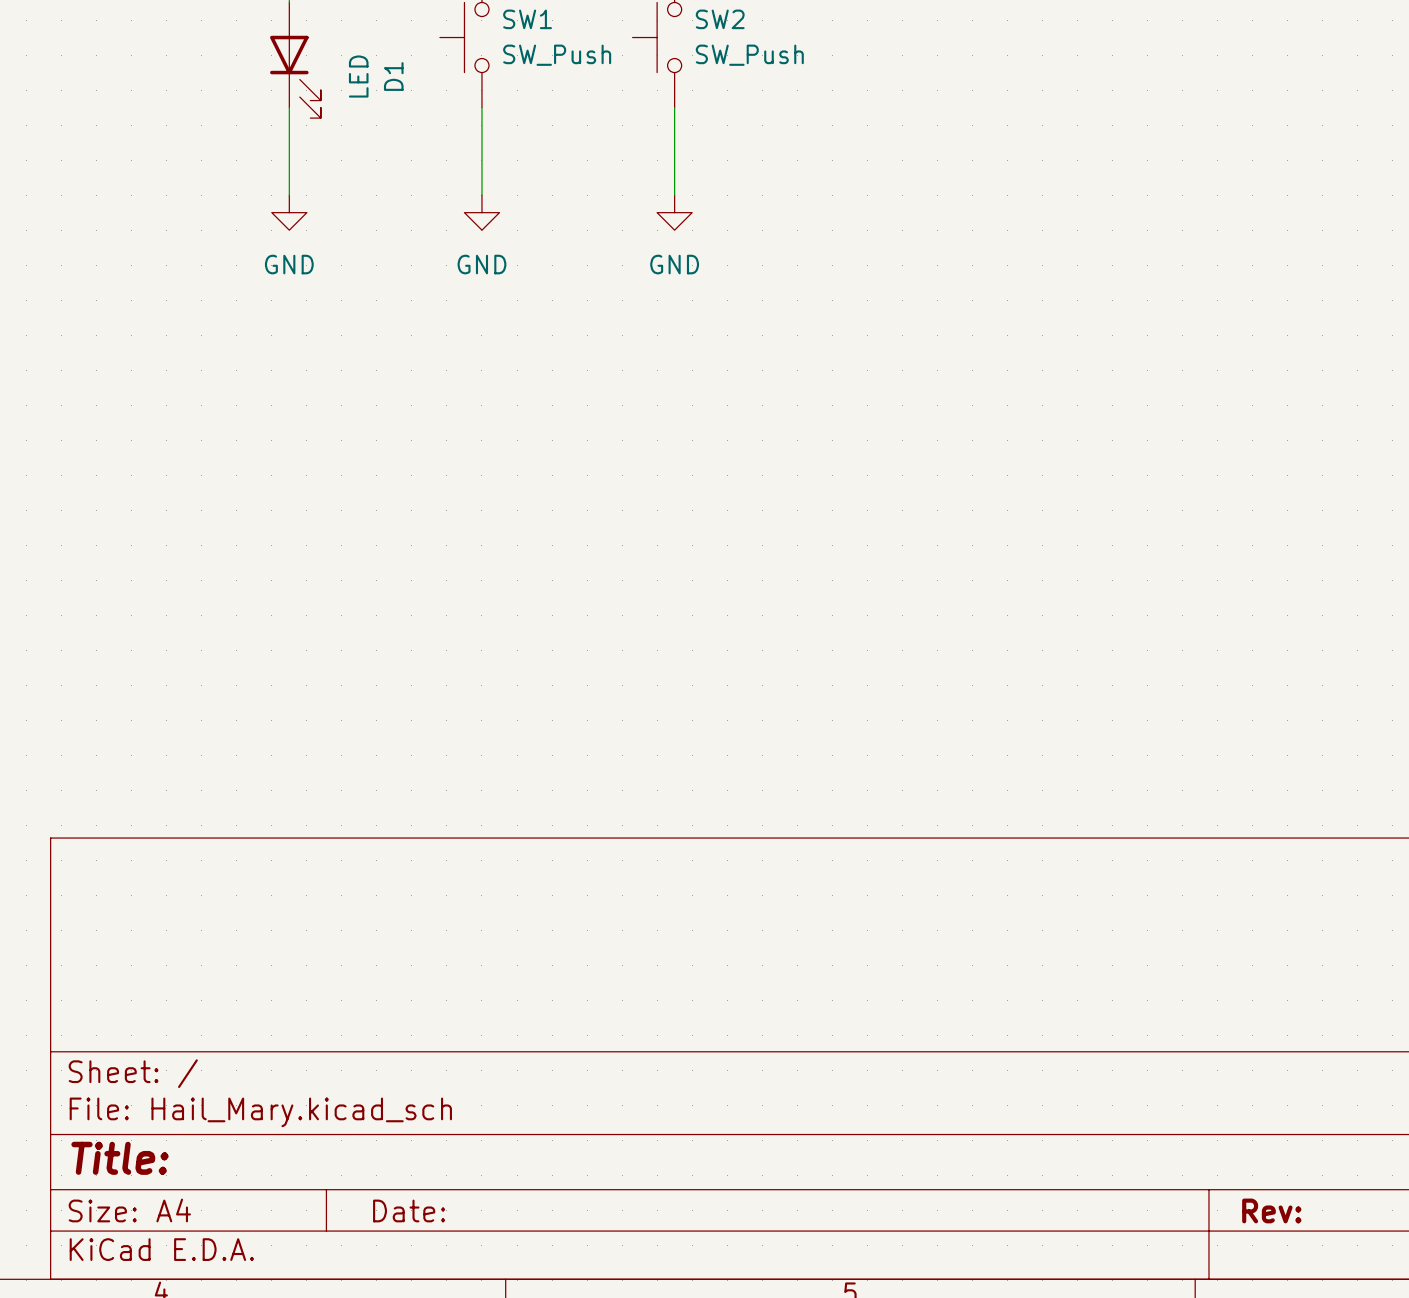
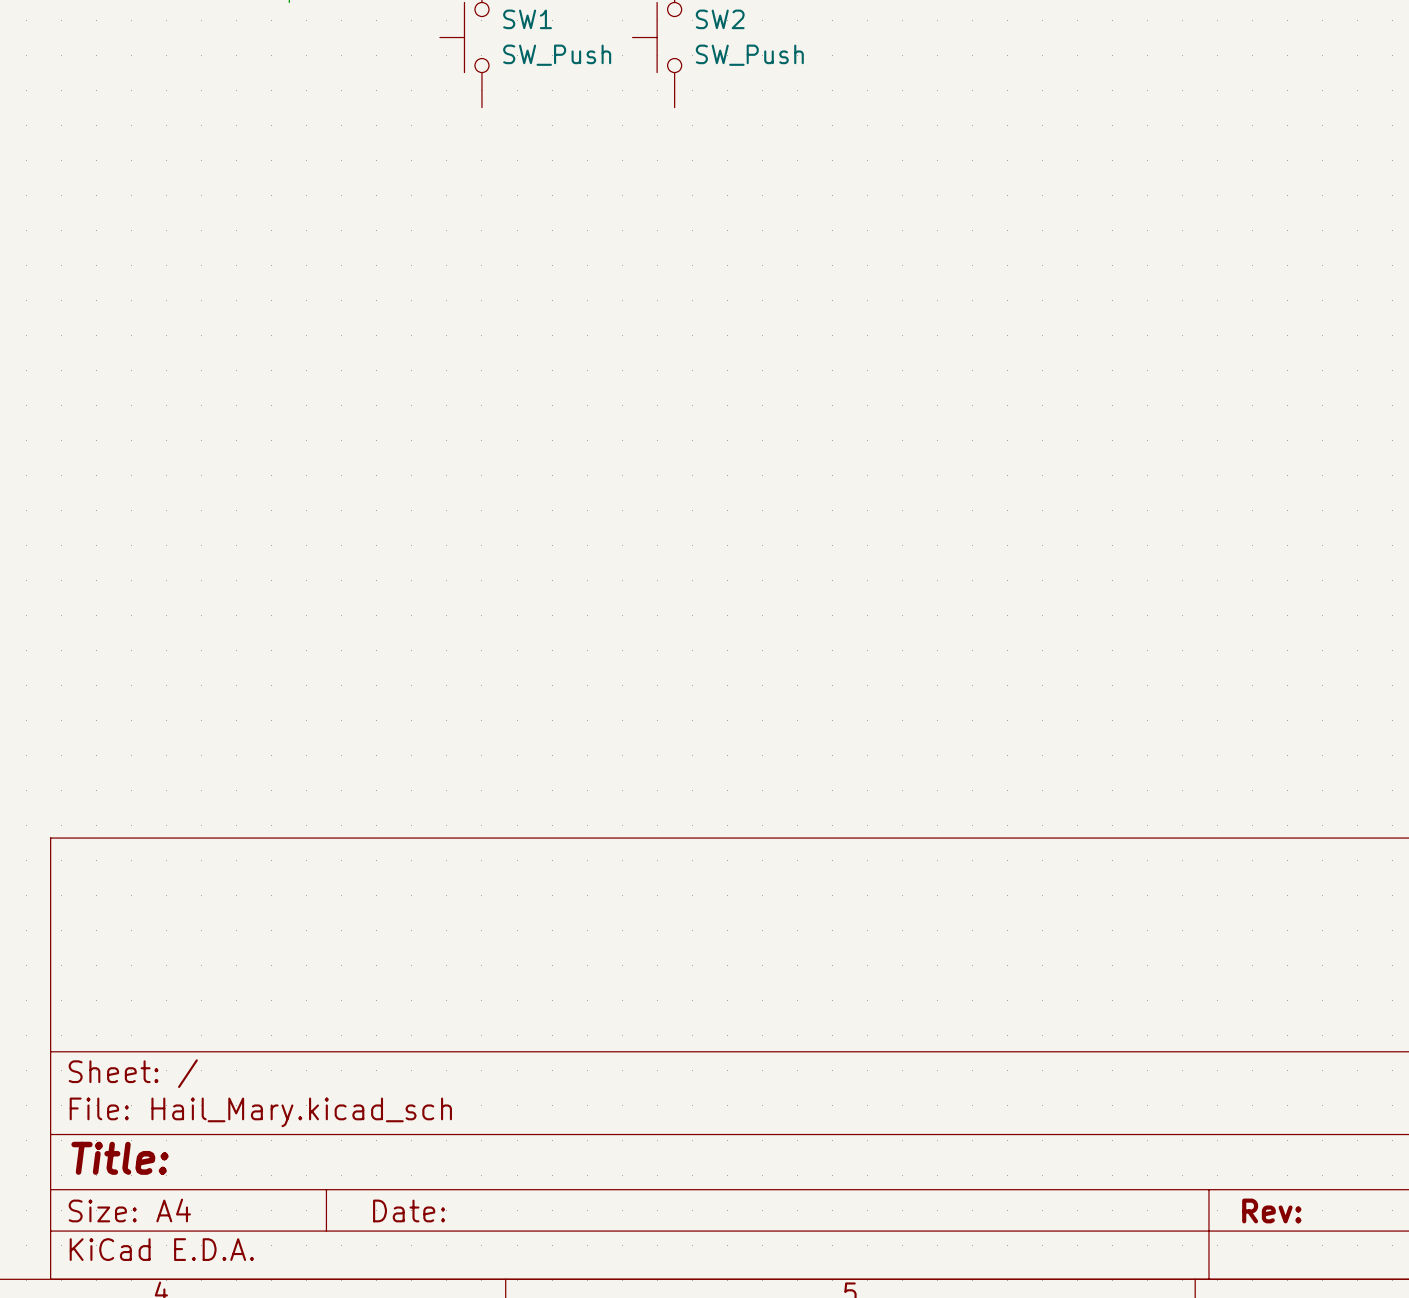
D1: LED (295, 60) -> none
wire: (289, 107) (289, 195) -> none
wire: (481, 107) (481, 195) -> none
wire: (674, 107) (674, 195) -> none
power symbol: GND (289, 212) -> none
power symbol: GND (481, 212) -> none
power symbol: GND (674, 212) -> none

